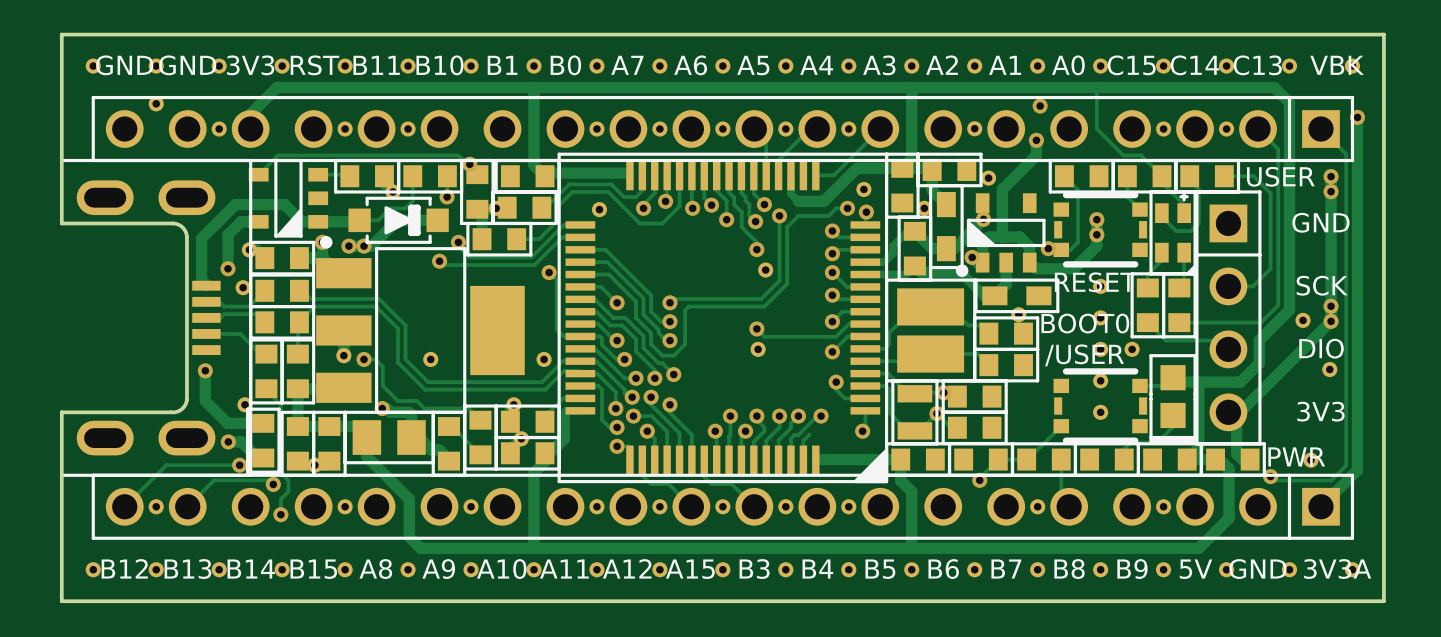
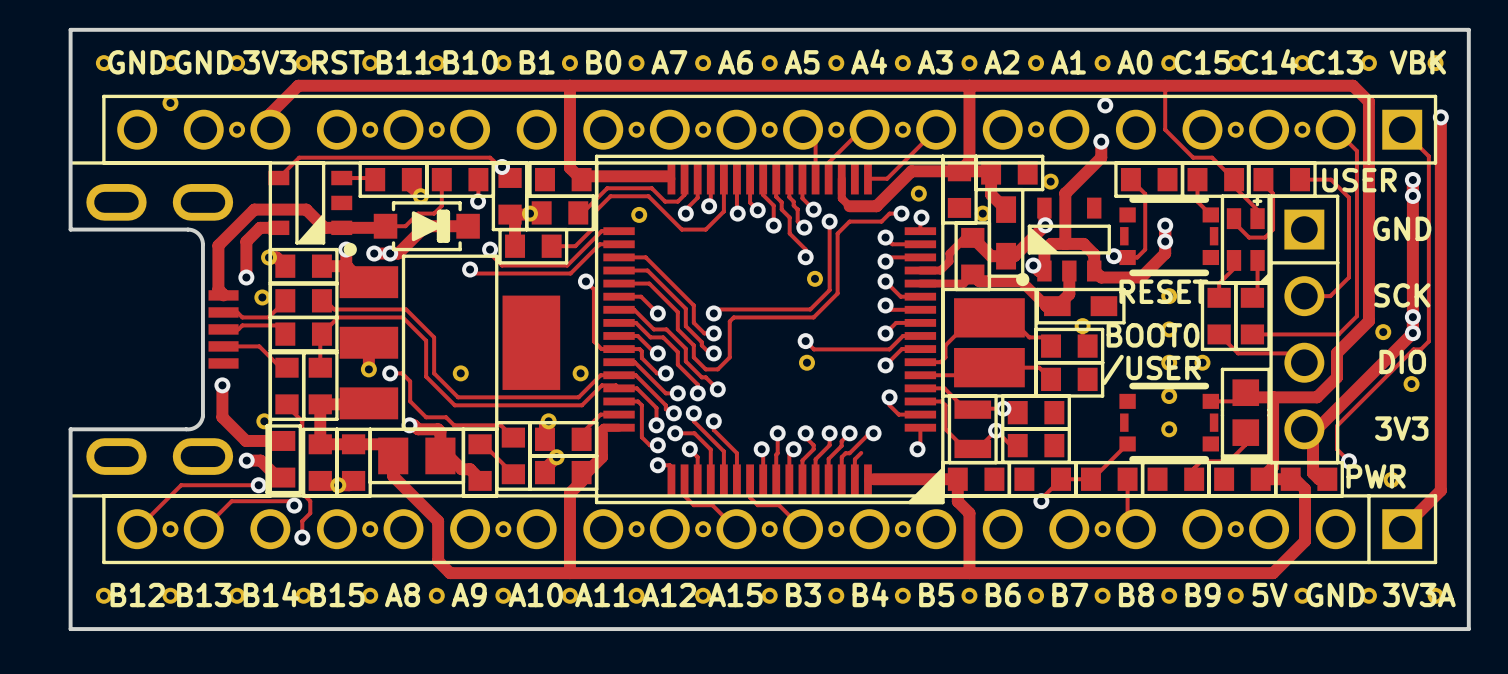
track: (1346, 329) (1346, 465) (1331, 480) (1274, 480) (1270, 476) -> (1428, 341) (1420, 349) (1413, 349) (1336, 425) (1336, 449) (1348, 461)
via position: (1270, 476) -> (1348, 461)

